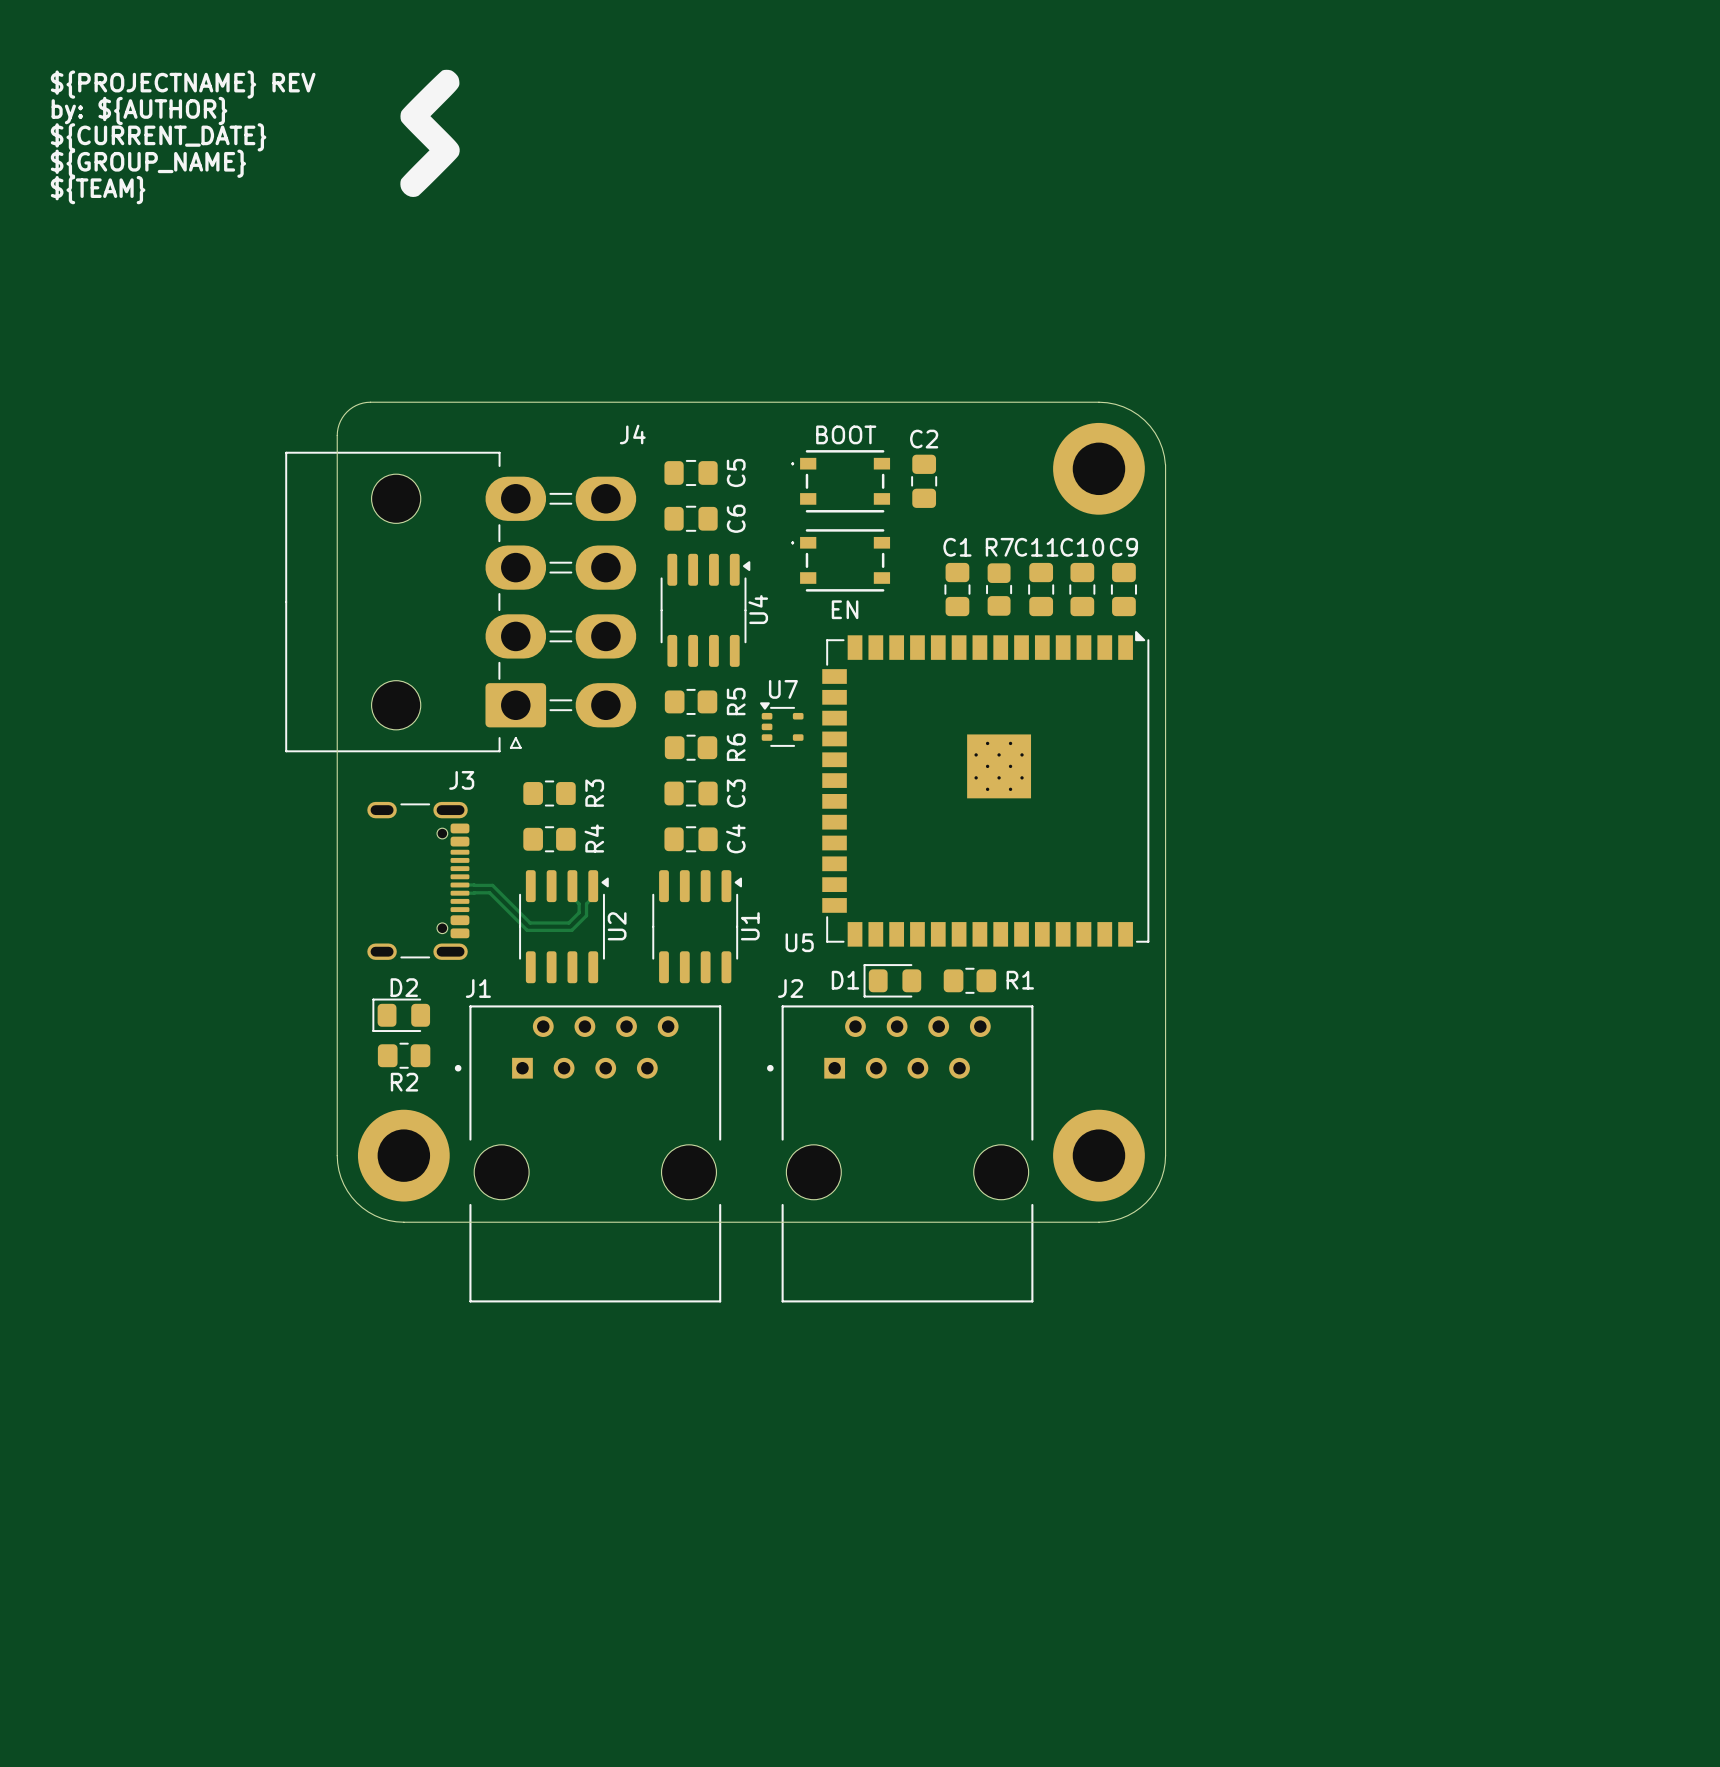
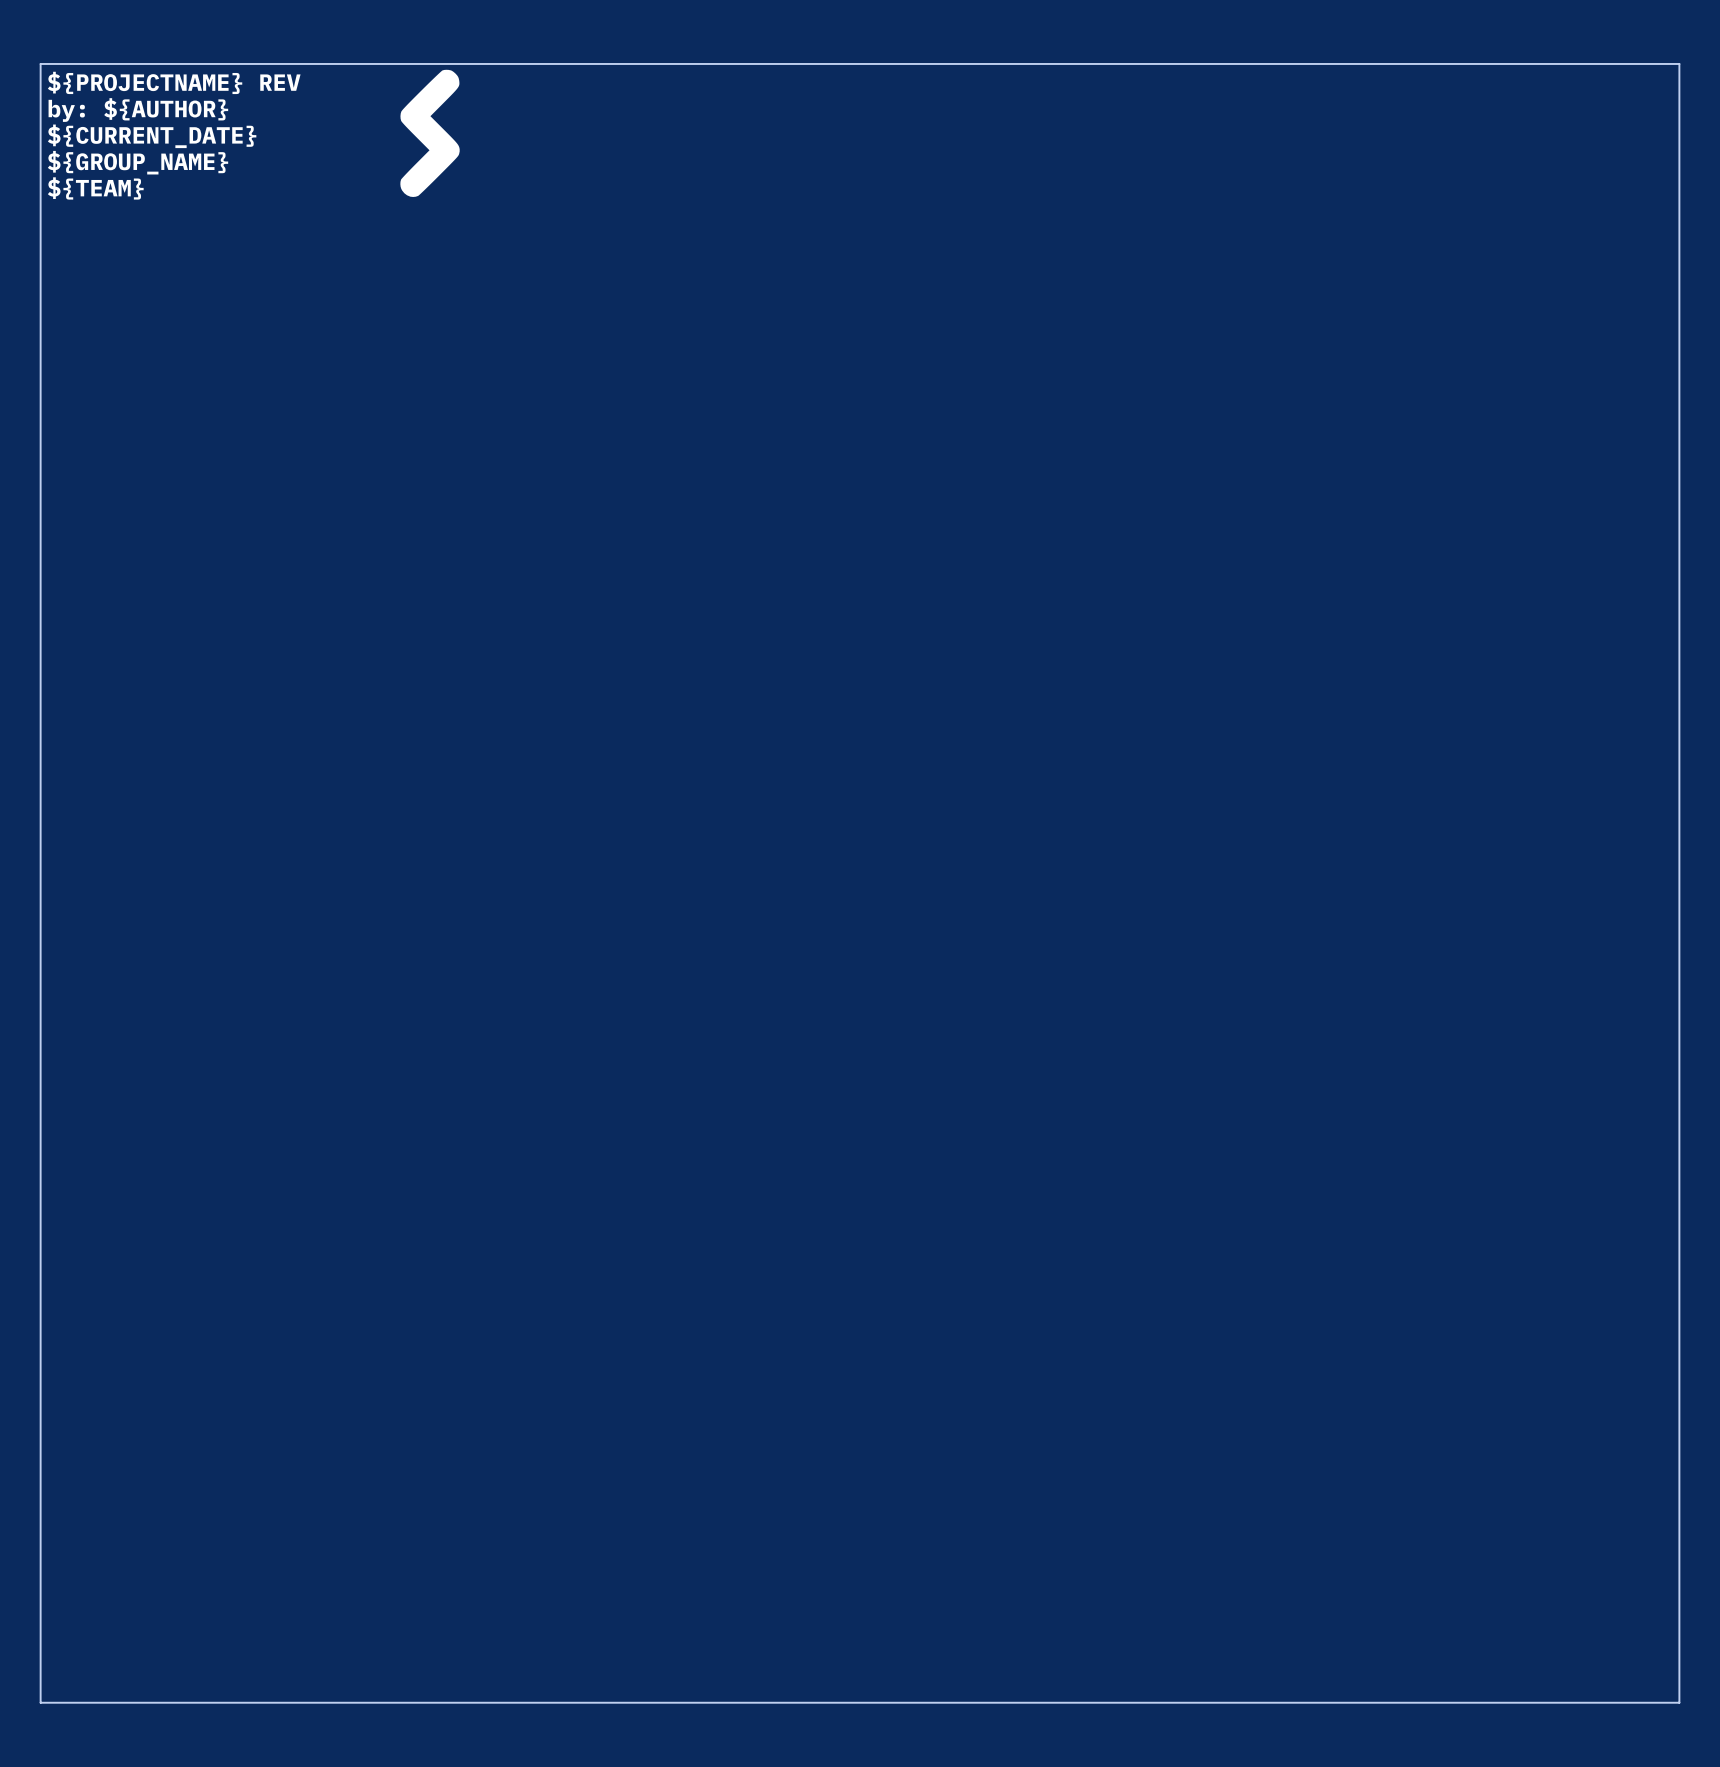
board edge: none -> (40, 63) (1679, 63) (1679, 1702) (40, 1702) (40, 63)
board edge: (1165, 464) (1162, 448) (1150, 426) (1131, 410) (1107, 402) (370, 402) (356, 405) (346, 411) (340, 421) (337, 435) (337, 1155) (340, 1177) (347, 1191) (356, 1202) (374, 1215) (389, 1220) (403, 1222) (1098, 1222) (1120, 1218) (1134, 1212) (1146, 1202) (1155, 1191) (1161, 1177) (1165, 1155) (1165, 464) -> none
part: (1098, 468) -> none
C5: (691, 472) -> none
BOOT: (845, 481) -> none
C2: (924, 481) -> none
C6: (691, 518) -> none
EN: (845, 560) -> none
C1: (957, 589) -> none
R7: (999, 589) -> none
C11: (1041, 589) -> none
C10: (1082, 589) -> none
C9: (1123, 589) -> none
J4: (460, 602) -> none
U4: (705, 610) -> none
R5: (691, 701) -> none
U7: (781, 724) -> none
R6: (691, 747) -> none
U5: (985, 788) -> none
R3: (549, 793) -> none
C3: (691, 793) -> none
R4: (549, 839) -> none
C4: (691, 839) -> none
J3: (418, 880) -> none
track: (459, 885) (492, 885) (530, 923) (568, 923) (579, 912) (579, 903) (572, 897) (572, 886) -> none
track: (593, 886) (593, 897) (586, 903) (586, 915) (571, 930) (527, 930) (489, 892) (459, 893) -> none
U2: (563, 926) -> none
U1: (697, 926) -> none
D1: (892, 980) -> none
R1: (969, 980) -> none
D2: (401, 1015) -> none
R2: (404, 1055) -> none
J1: (588, 1153) -> none
J2: (900, 1153) -> none
part: (403, 1155) -> none
part: (1098, 1155) -> none

